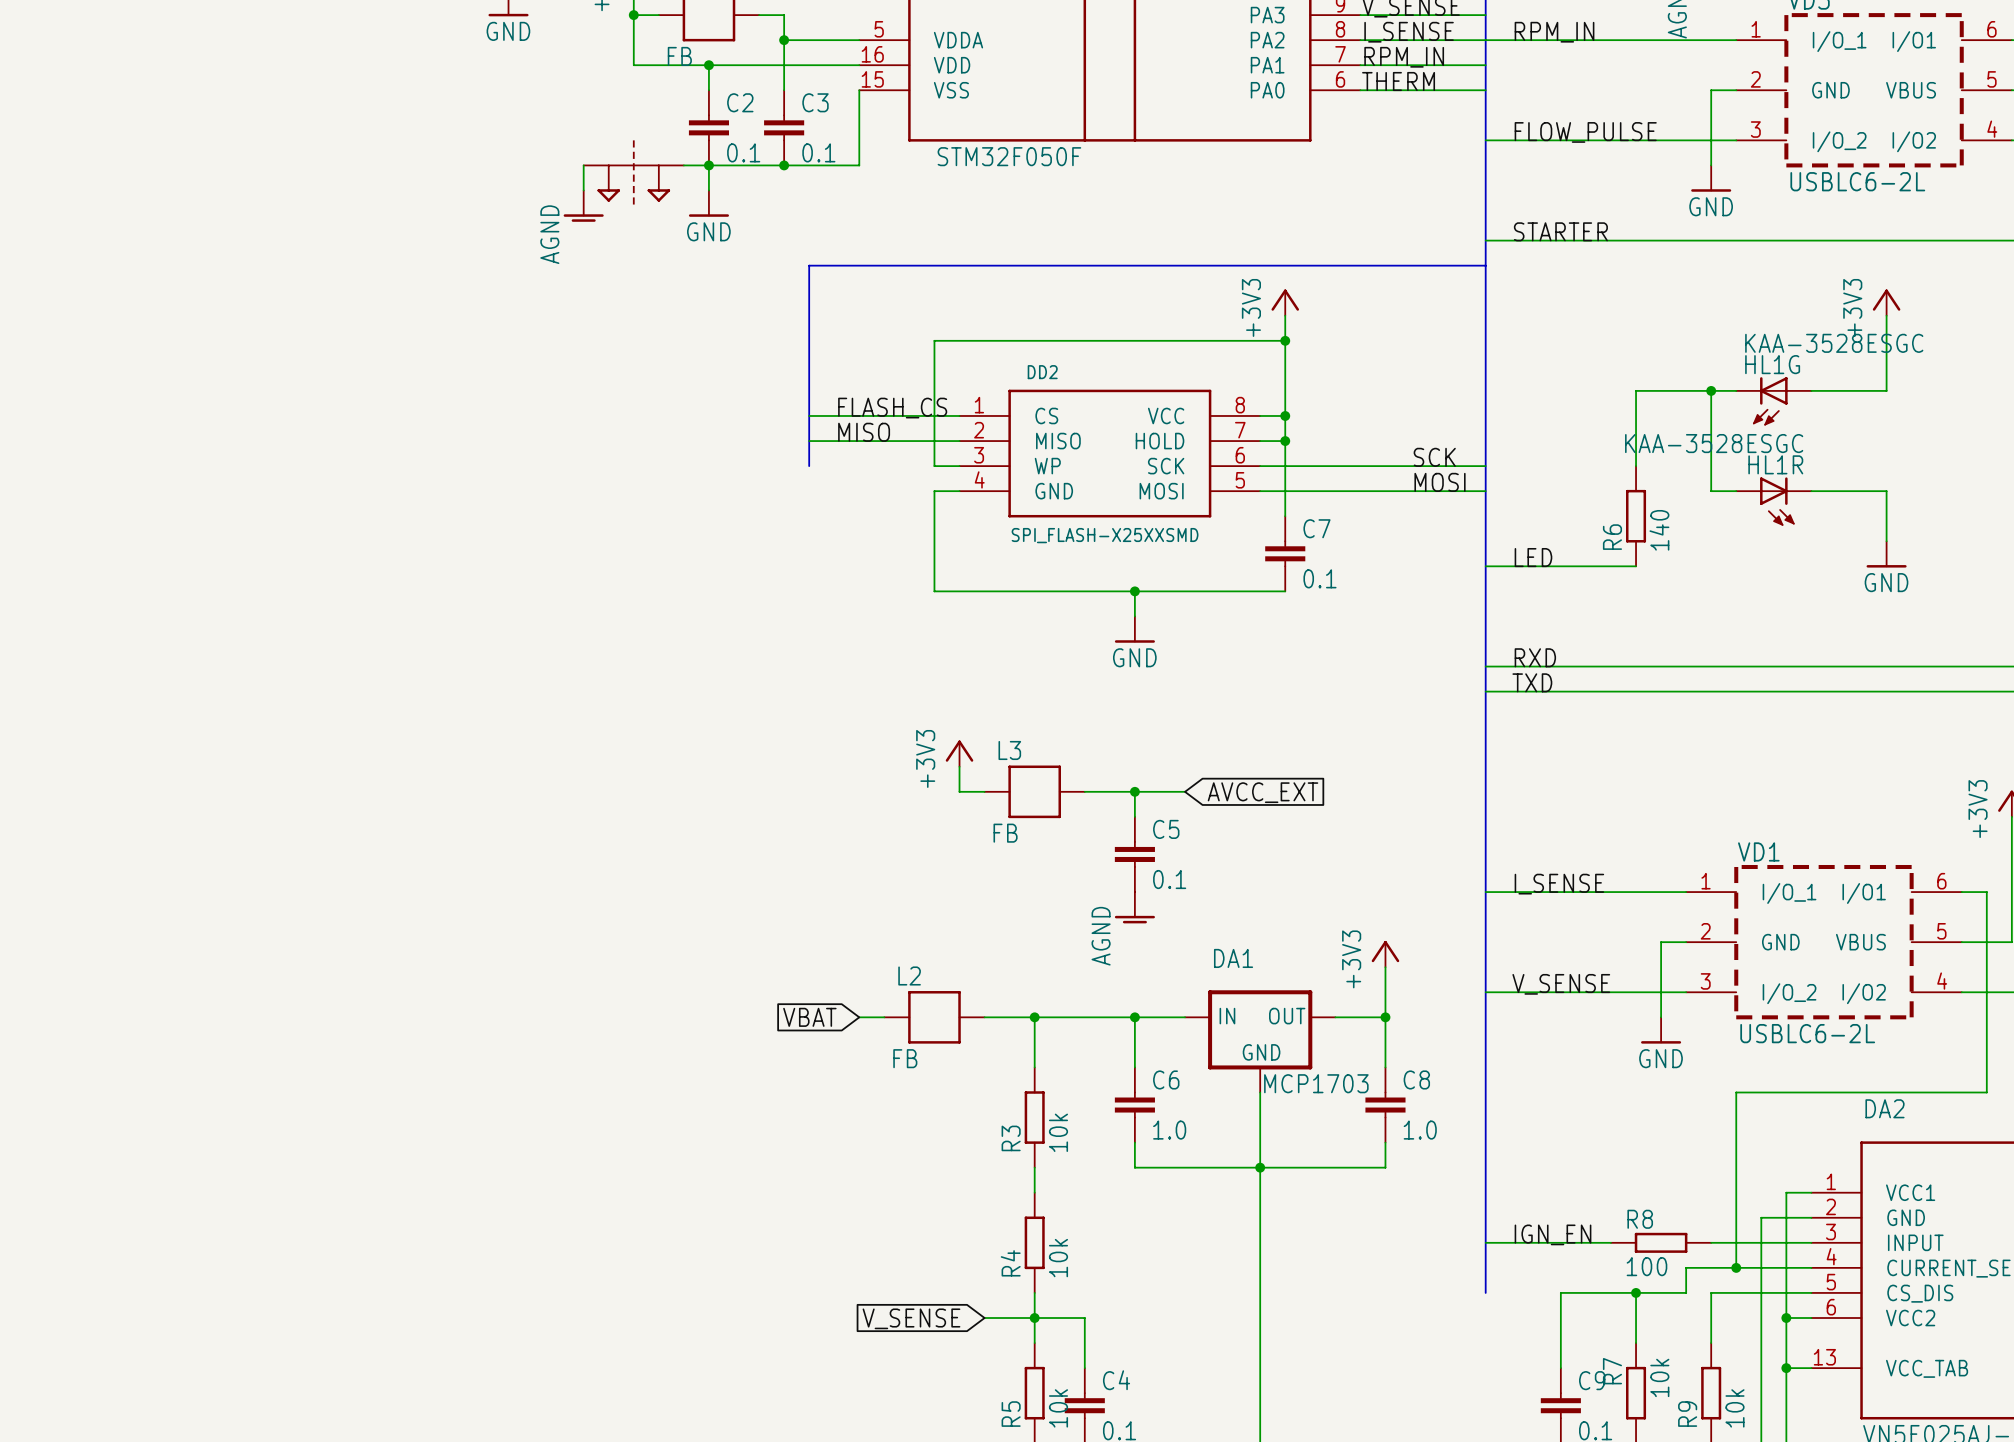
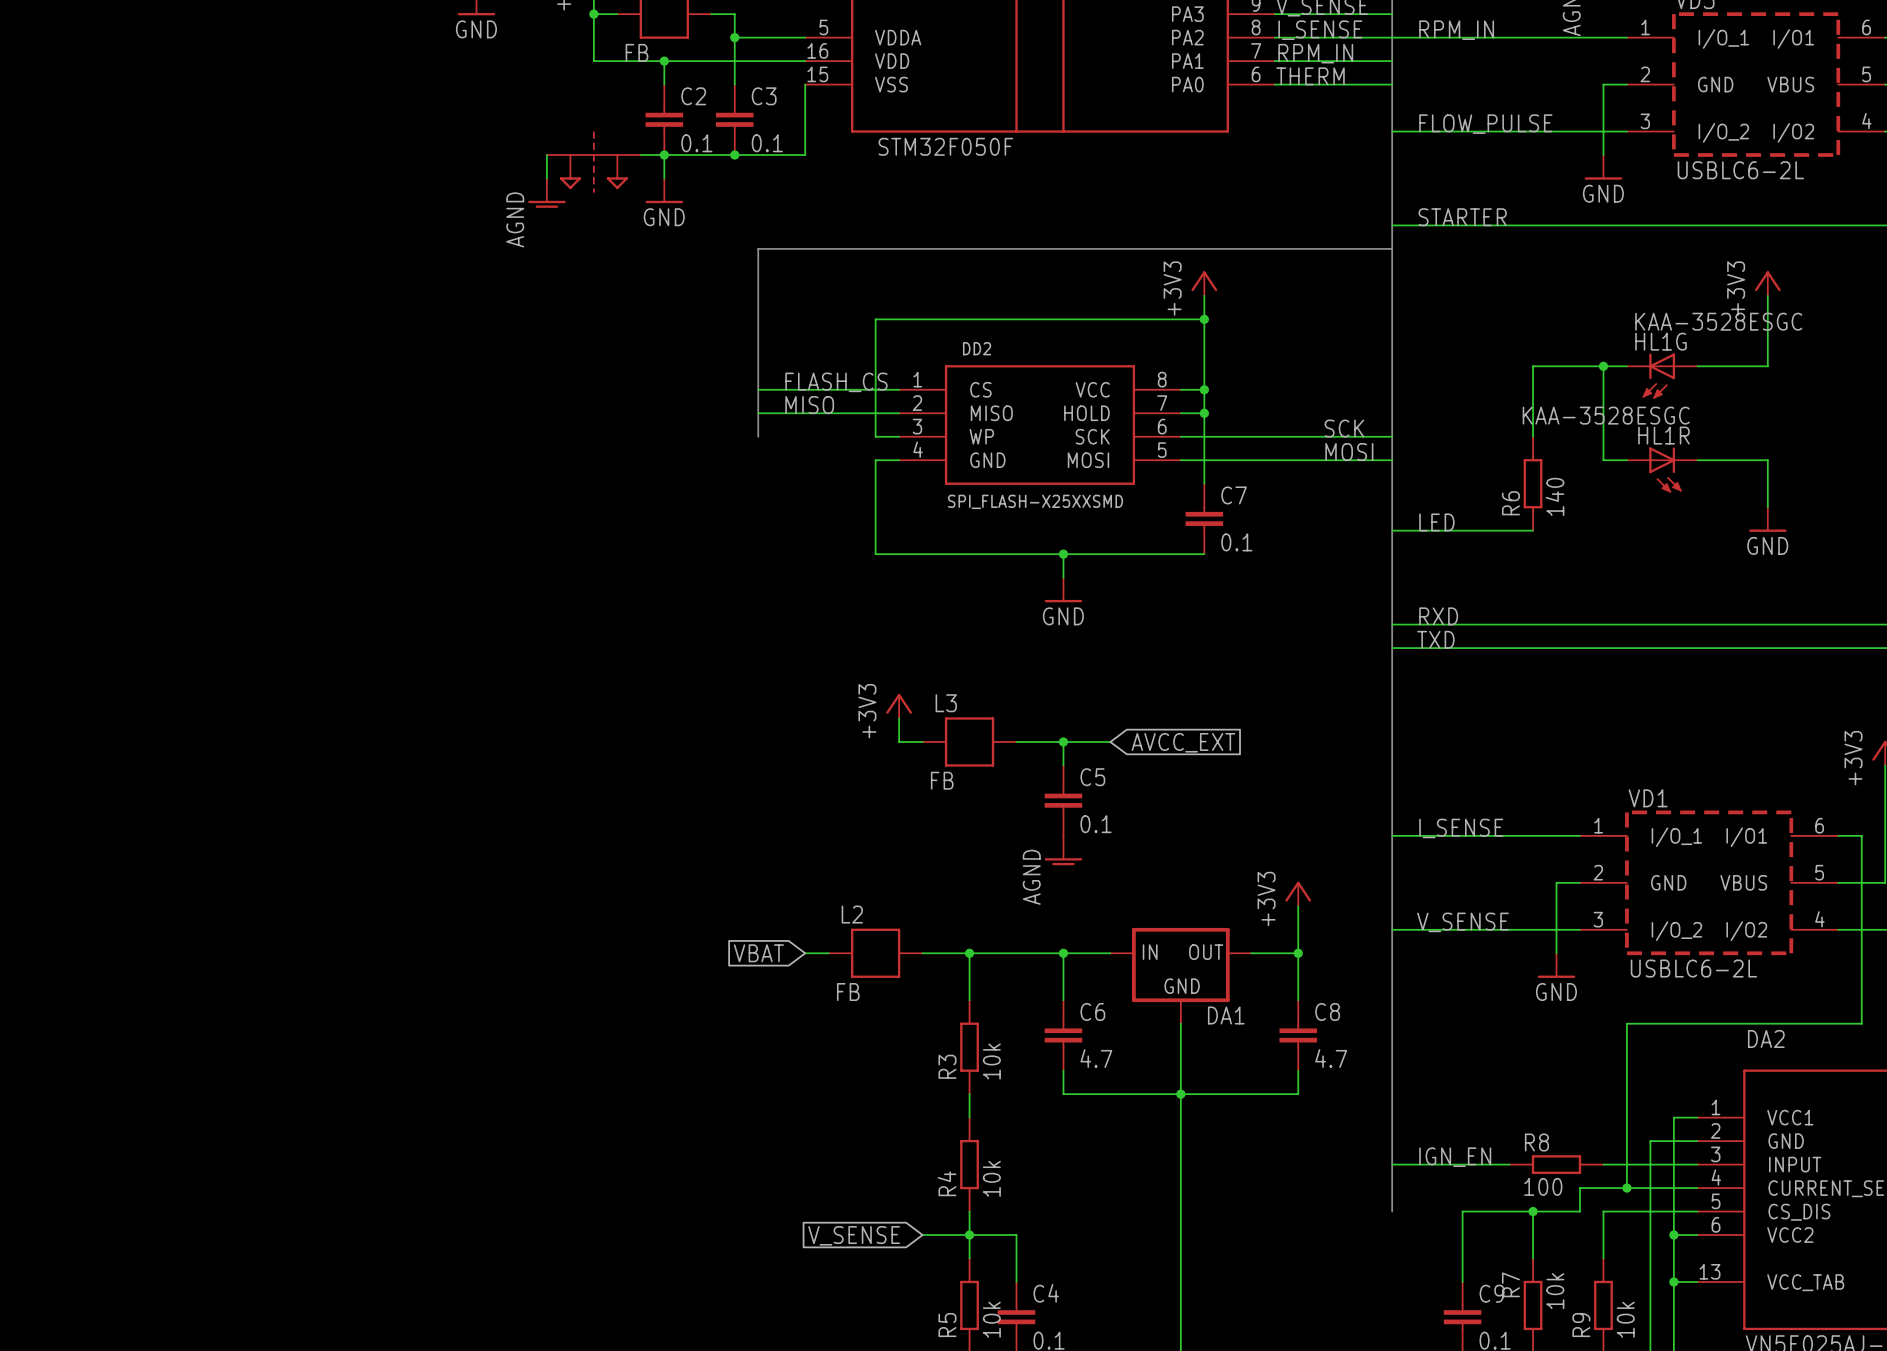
DA1 name position: DA1 (1233, 958) -> DA1 (1226, 1015)
DA1 value: MCP1703 (1316, 1083) -> none
C6 value: 1.0 (1169, 1130) -> 4.7 (1096, 1058)
C8 value: 1.0 (1420, 1130) -> 4.7 (1331, 1058)

